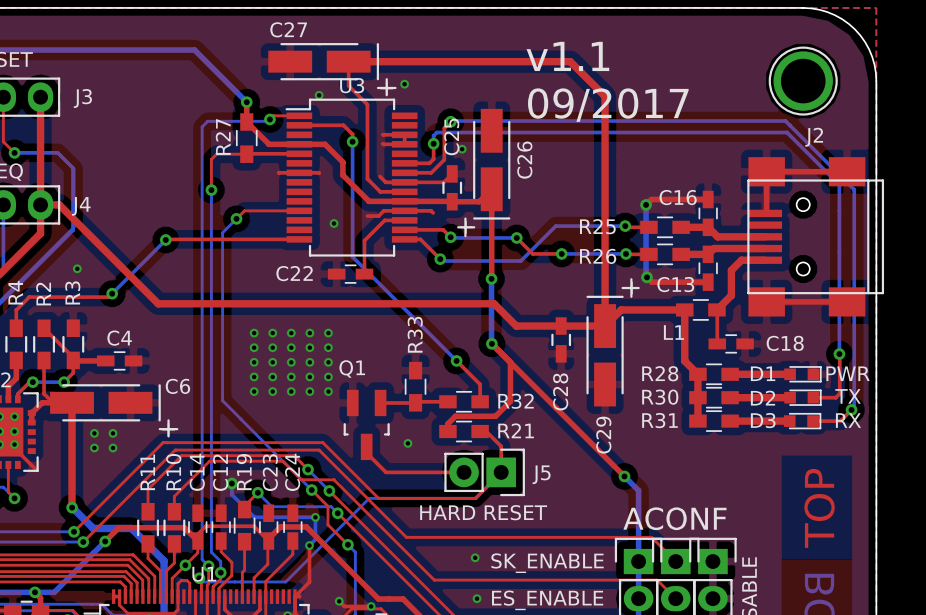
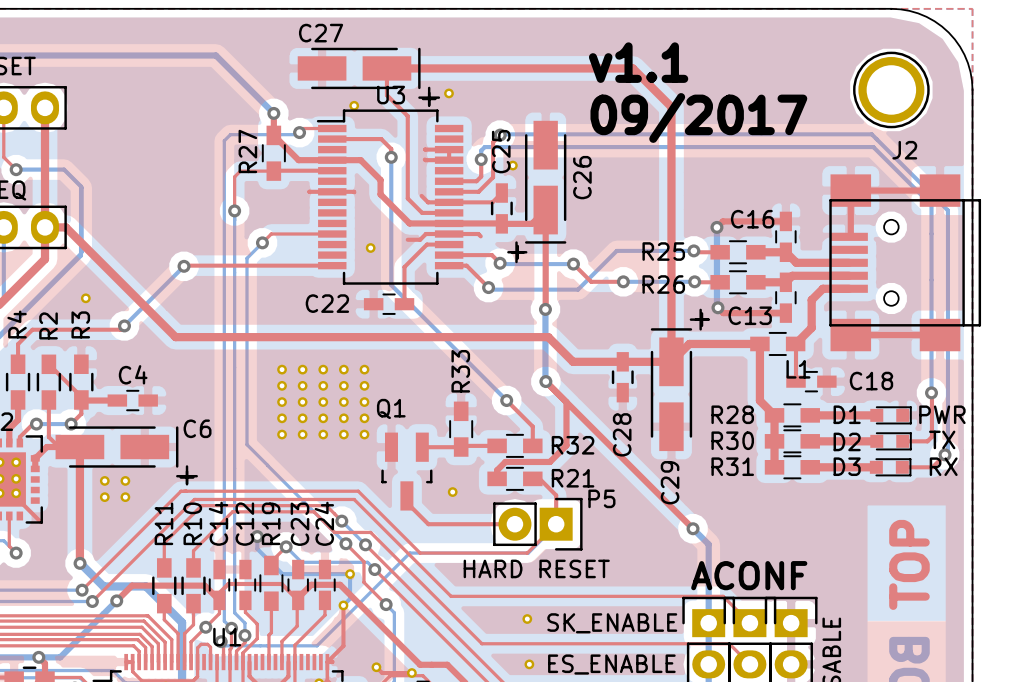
text: J3 (82, 98) -> none
text: J4 (81, 206) -> none
L1 name position: L1 (673, 332) -> L1 (798, 369)
P5 name: none -> P5 (601, 498)
text: J5 (541, 474) -> none

